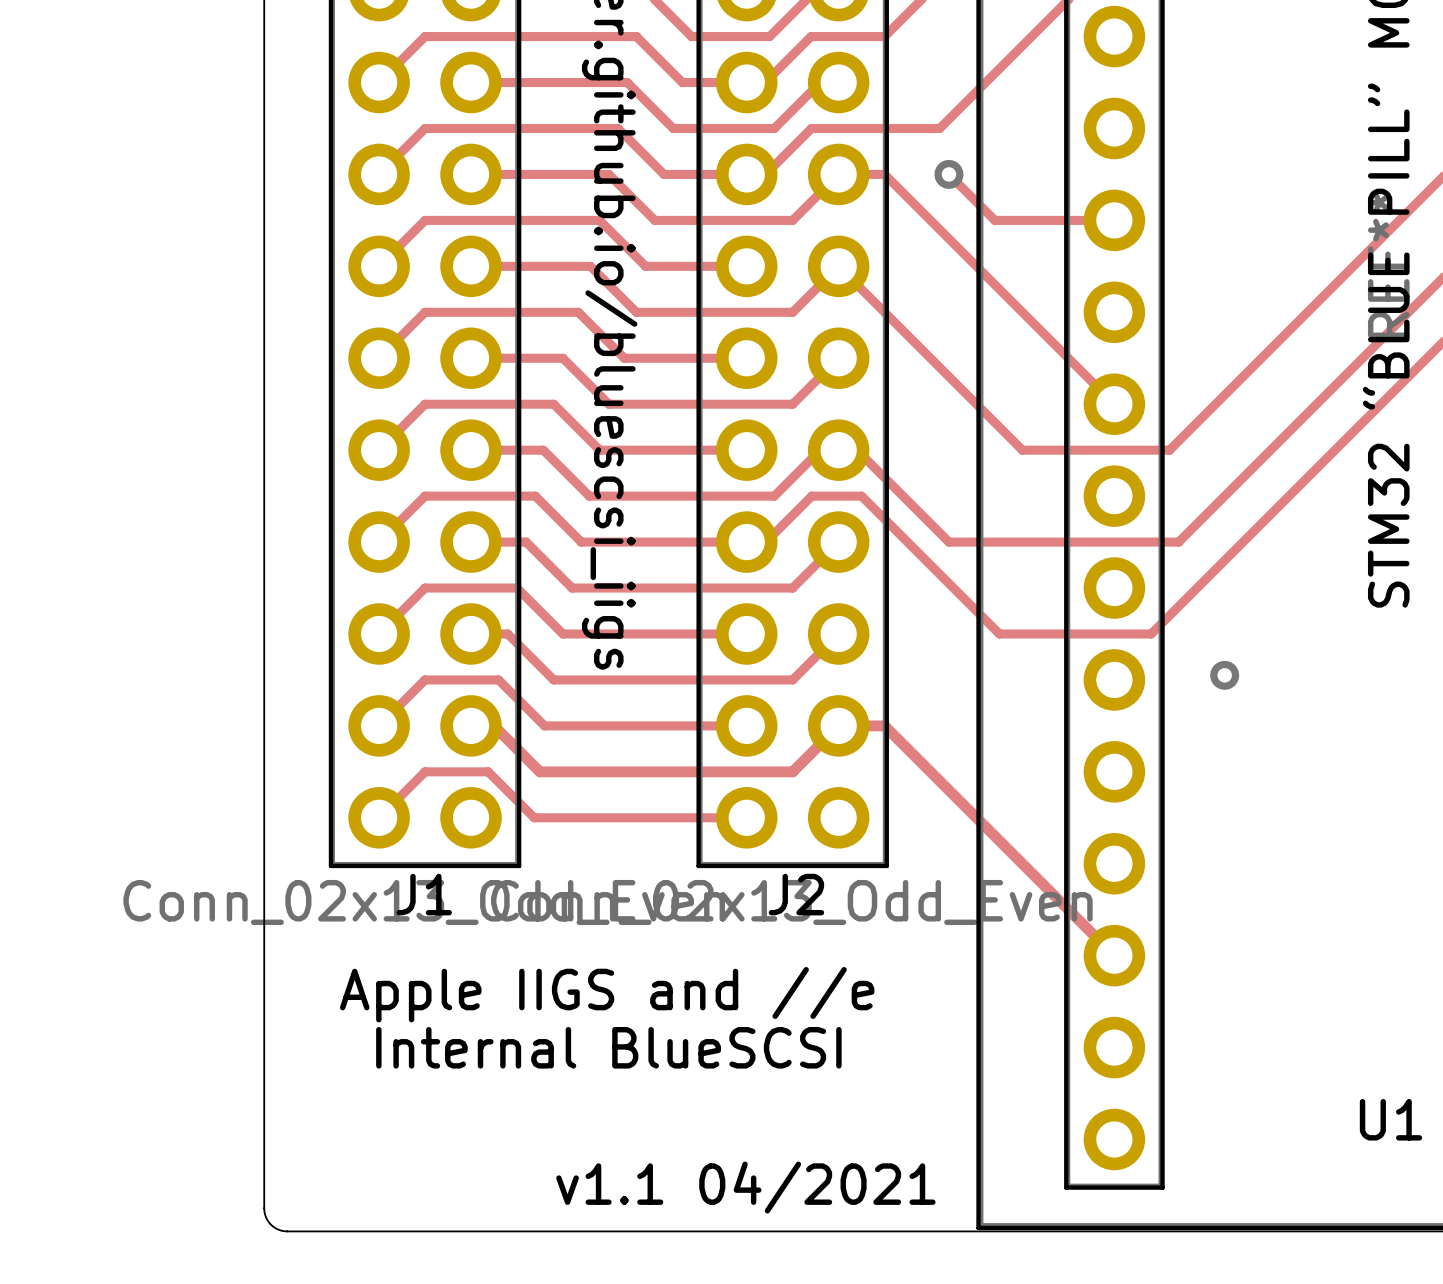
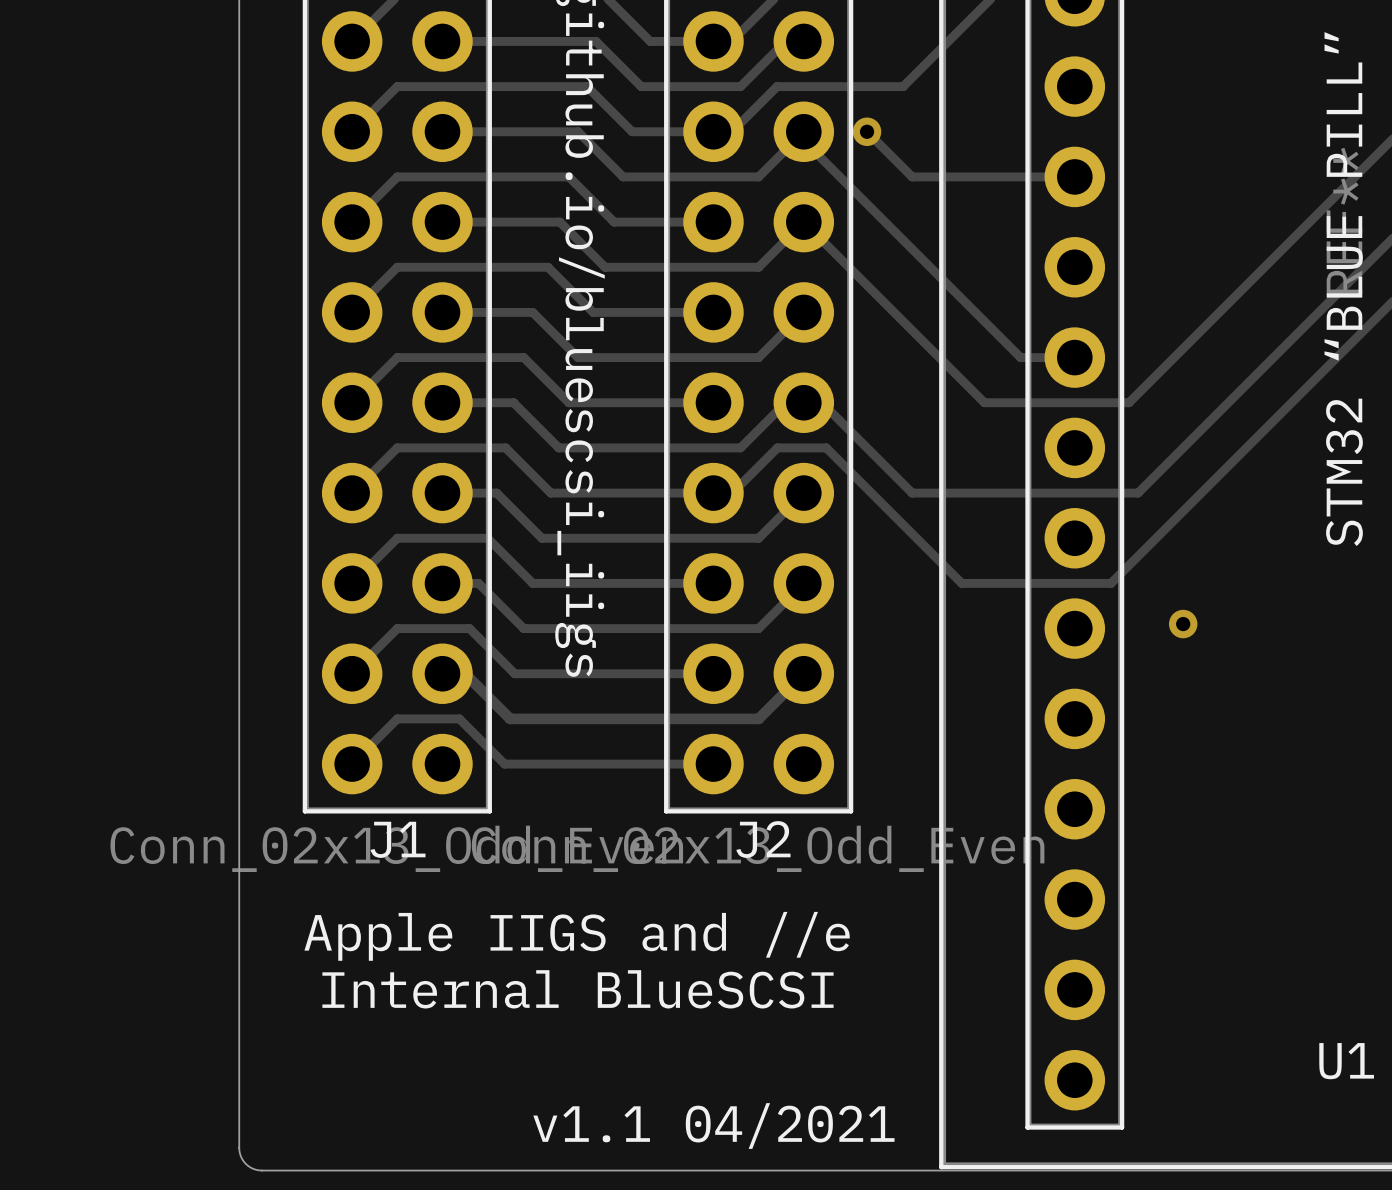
track: (838, 174) (884, 174) (1114, 404) -> (803, 131) (803, 140) (1020, 357) (1074, 357)
track: (948, 174) (994, 220) -> (867, 131) (912, 176) (957, 176)
via position: (948, 174) -> (867, 131)
track: (838, 725) (884, 725) (1114, 955) -> none

